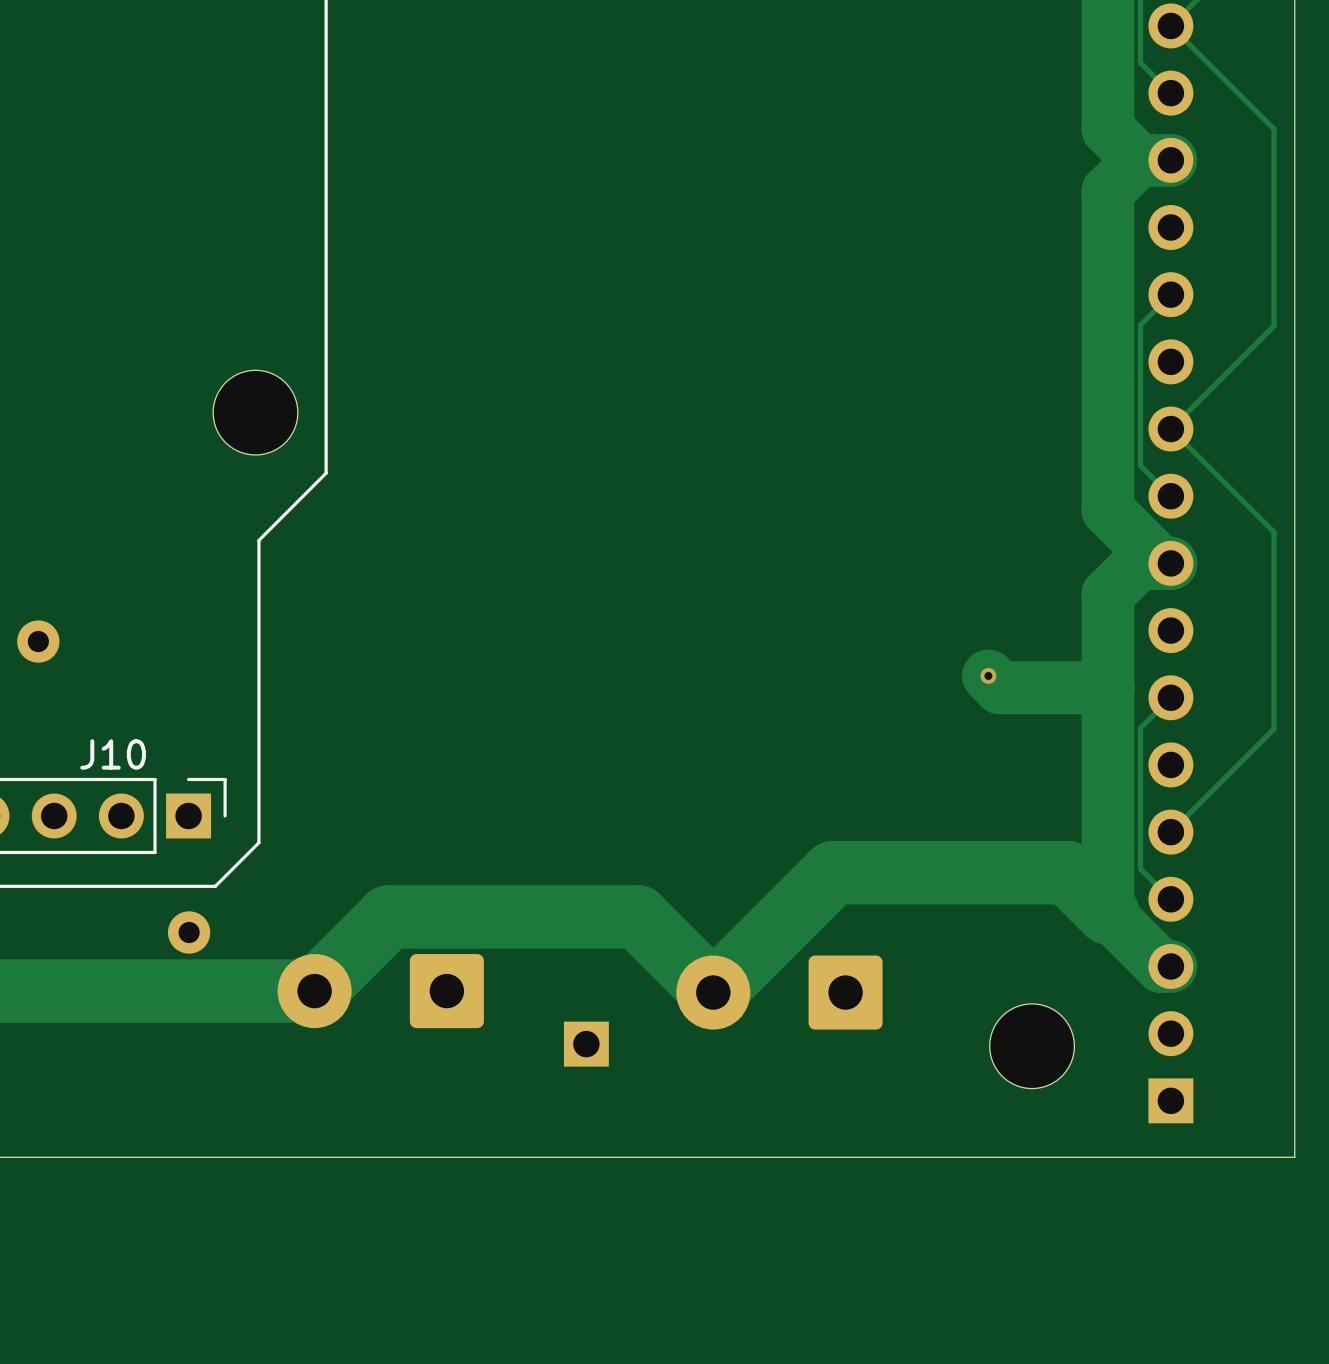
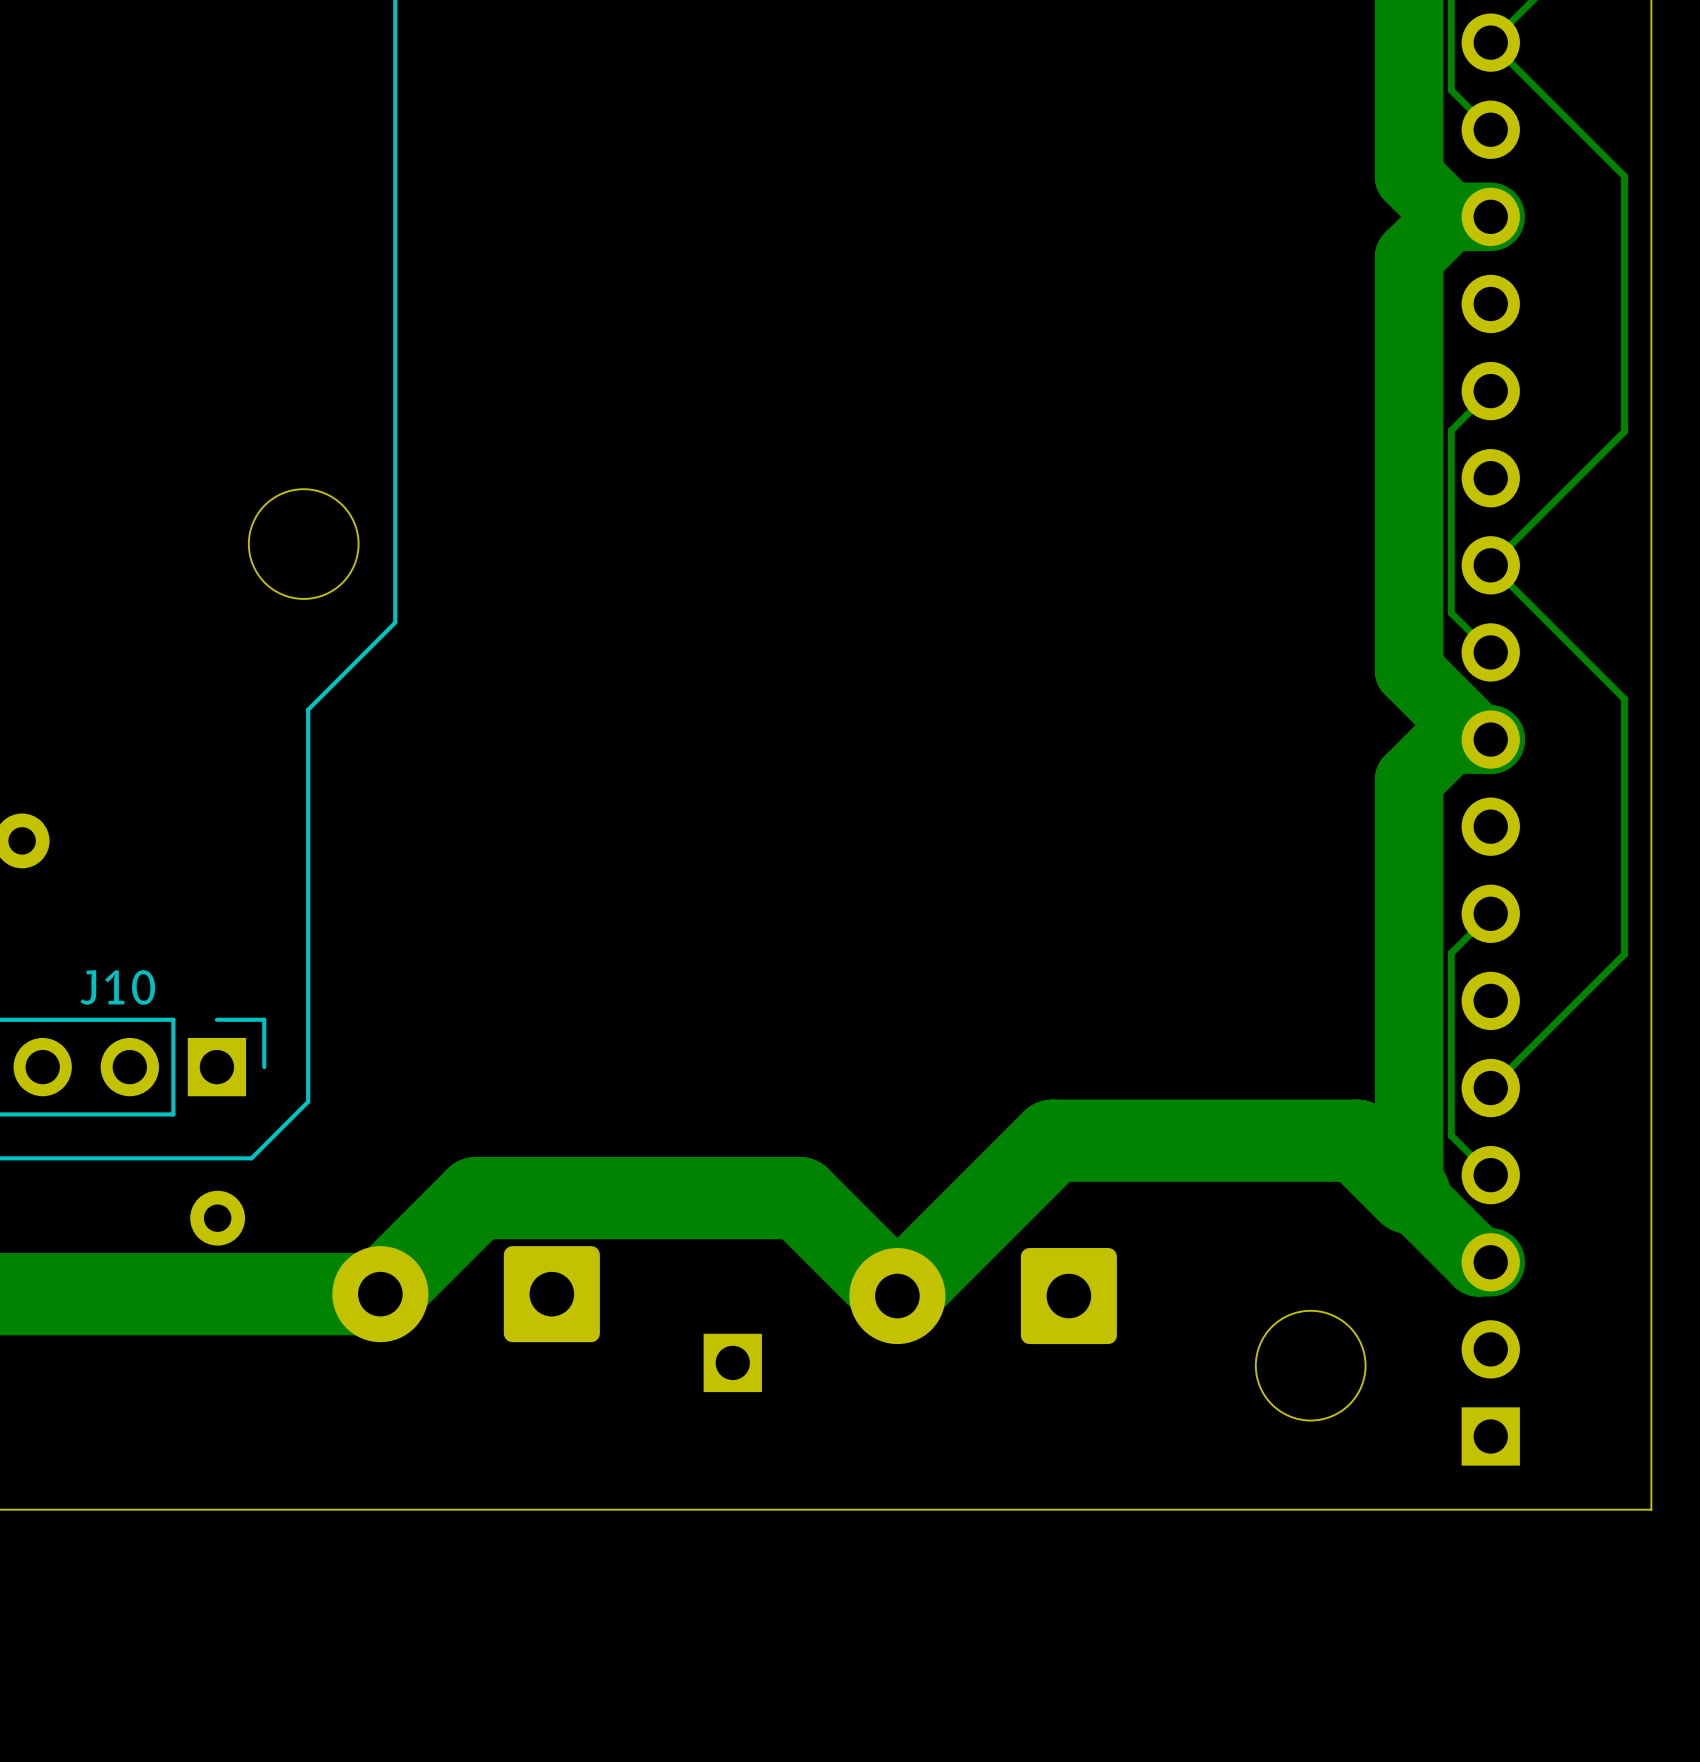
track: (988, 675) (1000, 687) (1107, 687) -> none
via: (988, 675) -> none

